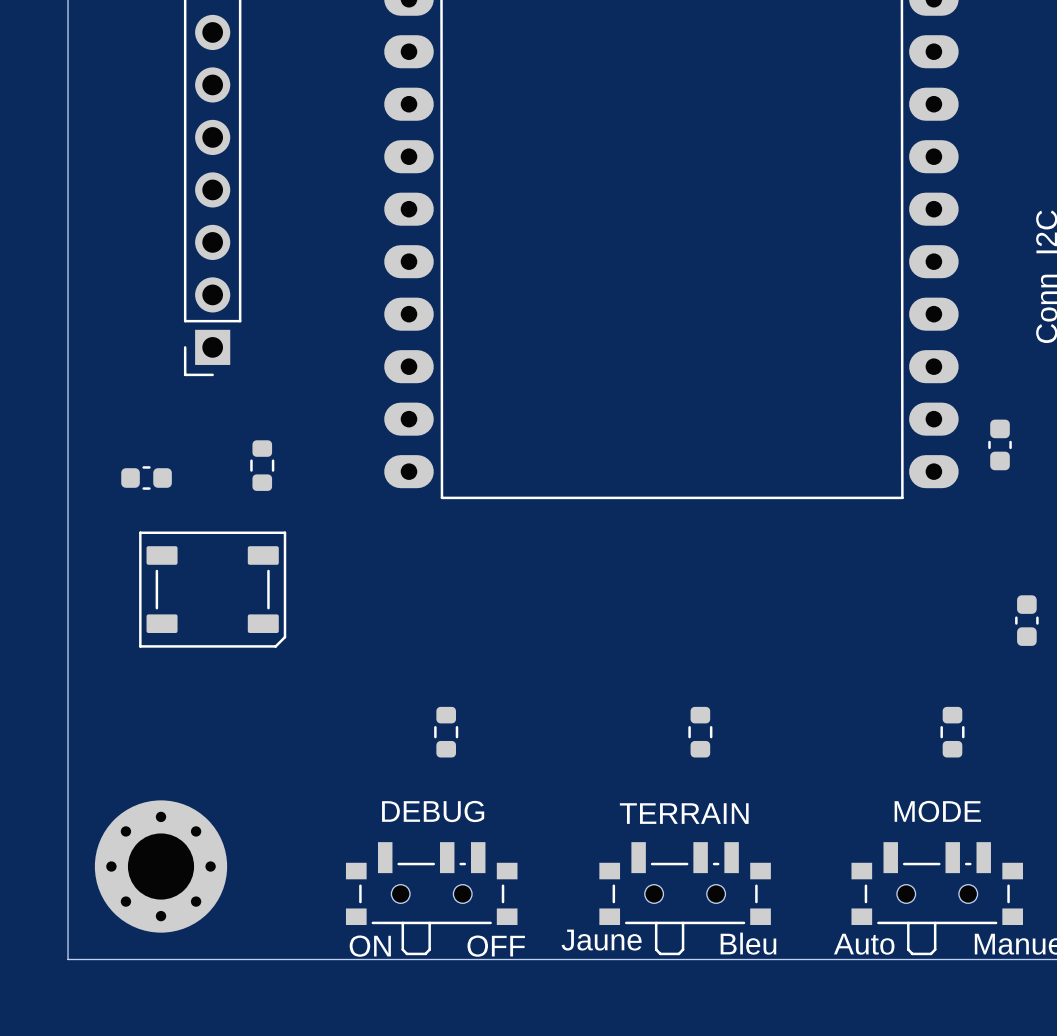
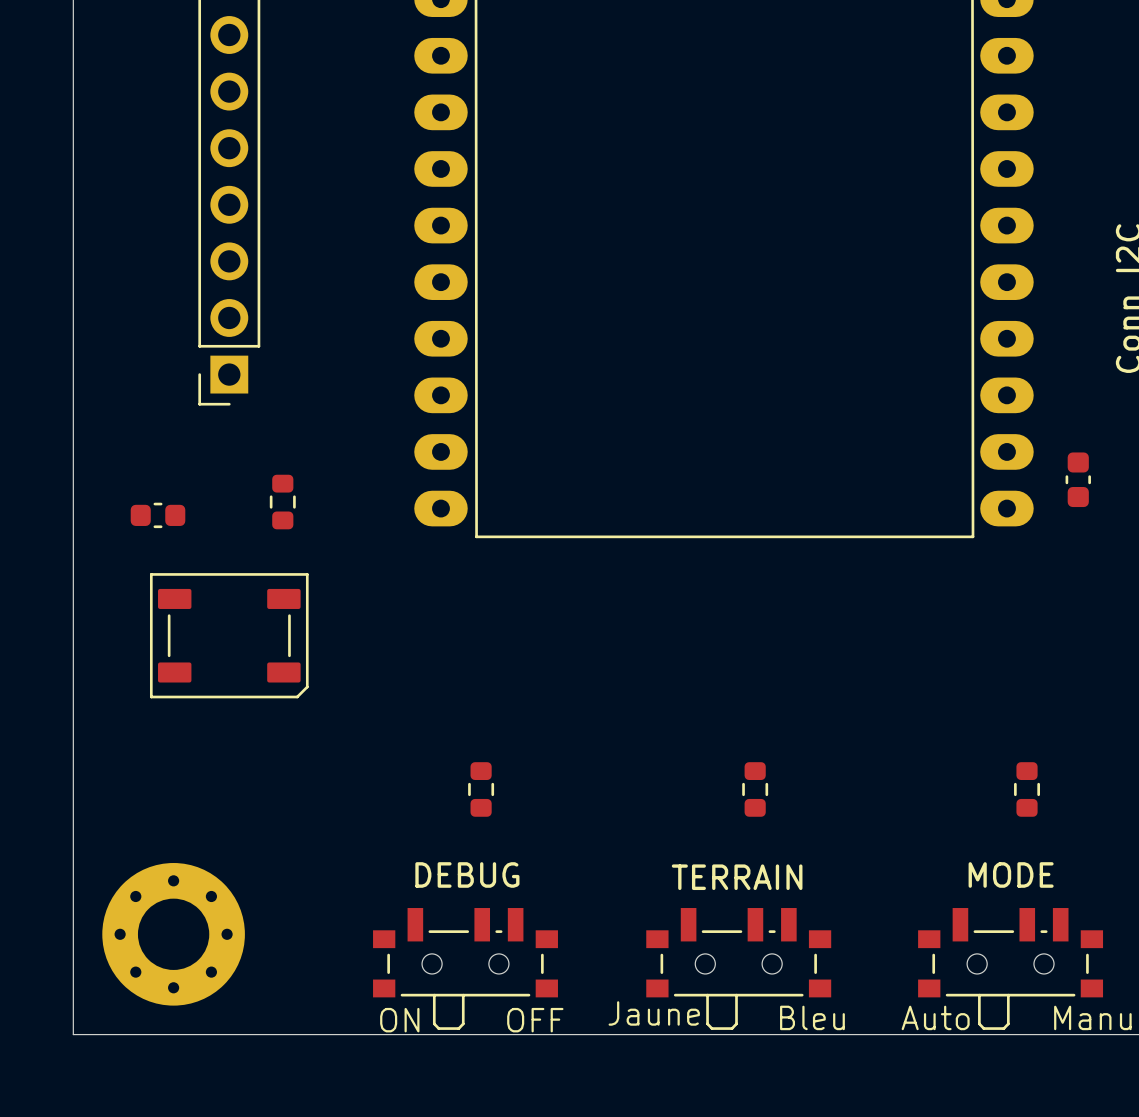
part: (1026, 620) -> none

